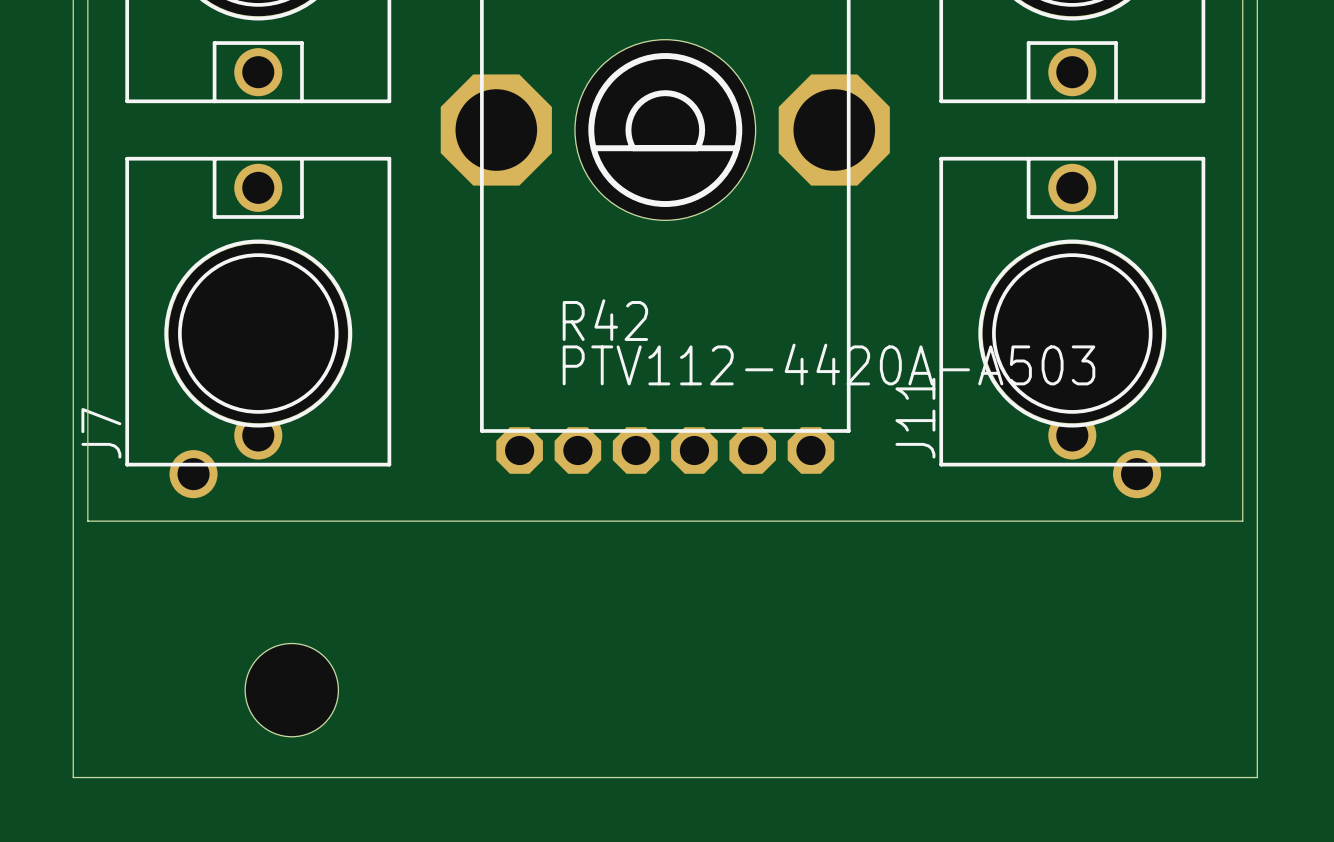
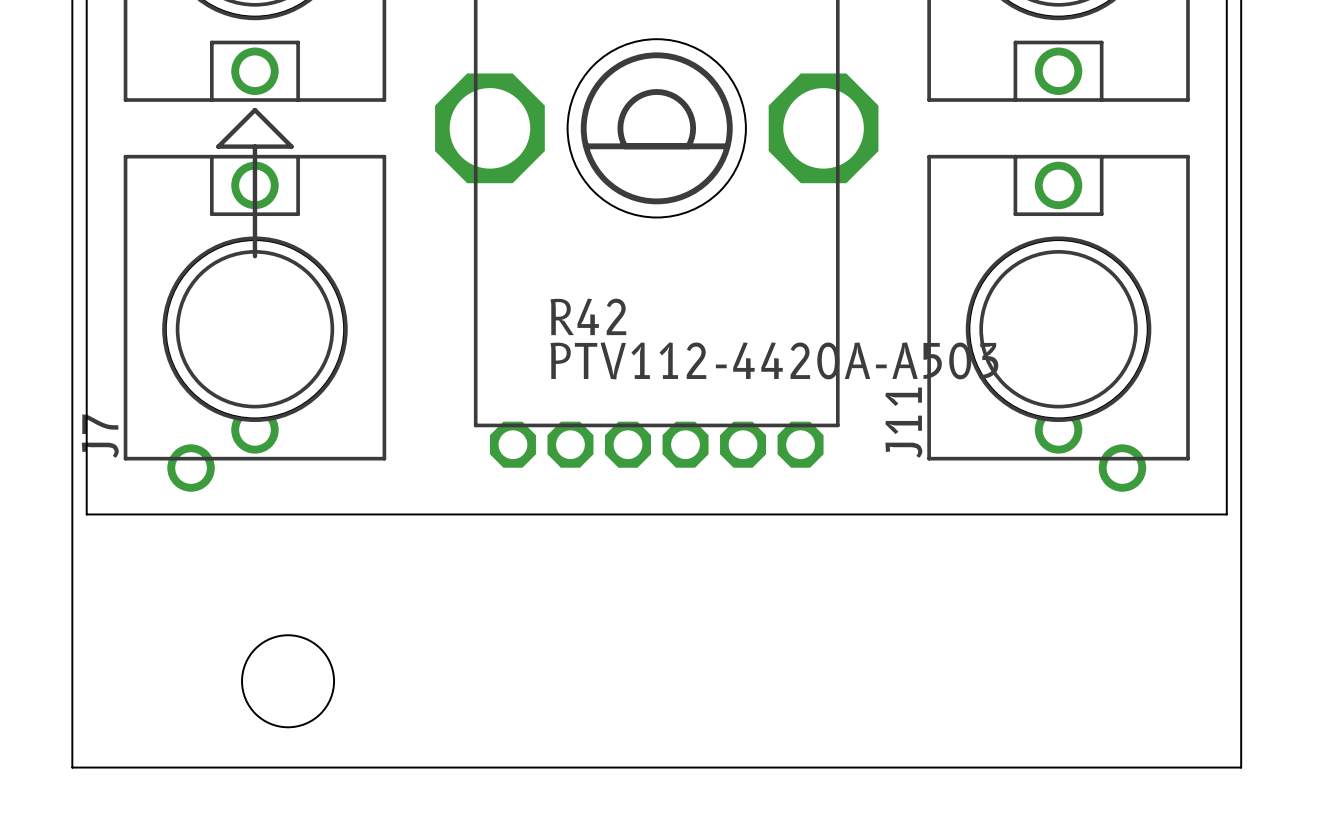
line: none -> (254, 110) (218, 146) (291, 146) (254, 110)
line: none -> (254, 146) (254, 256)

